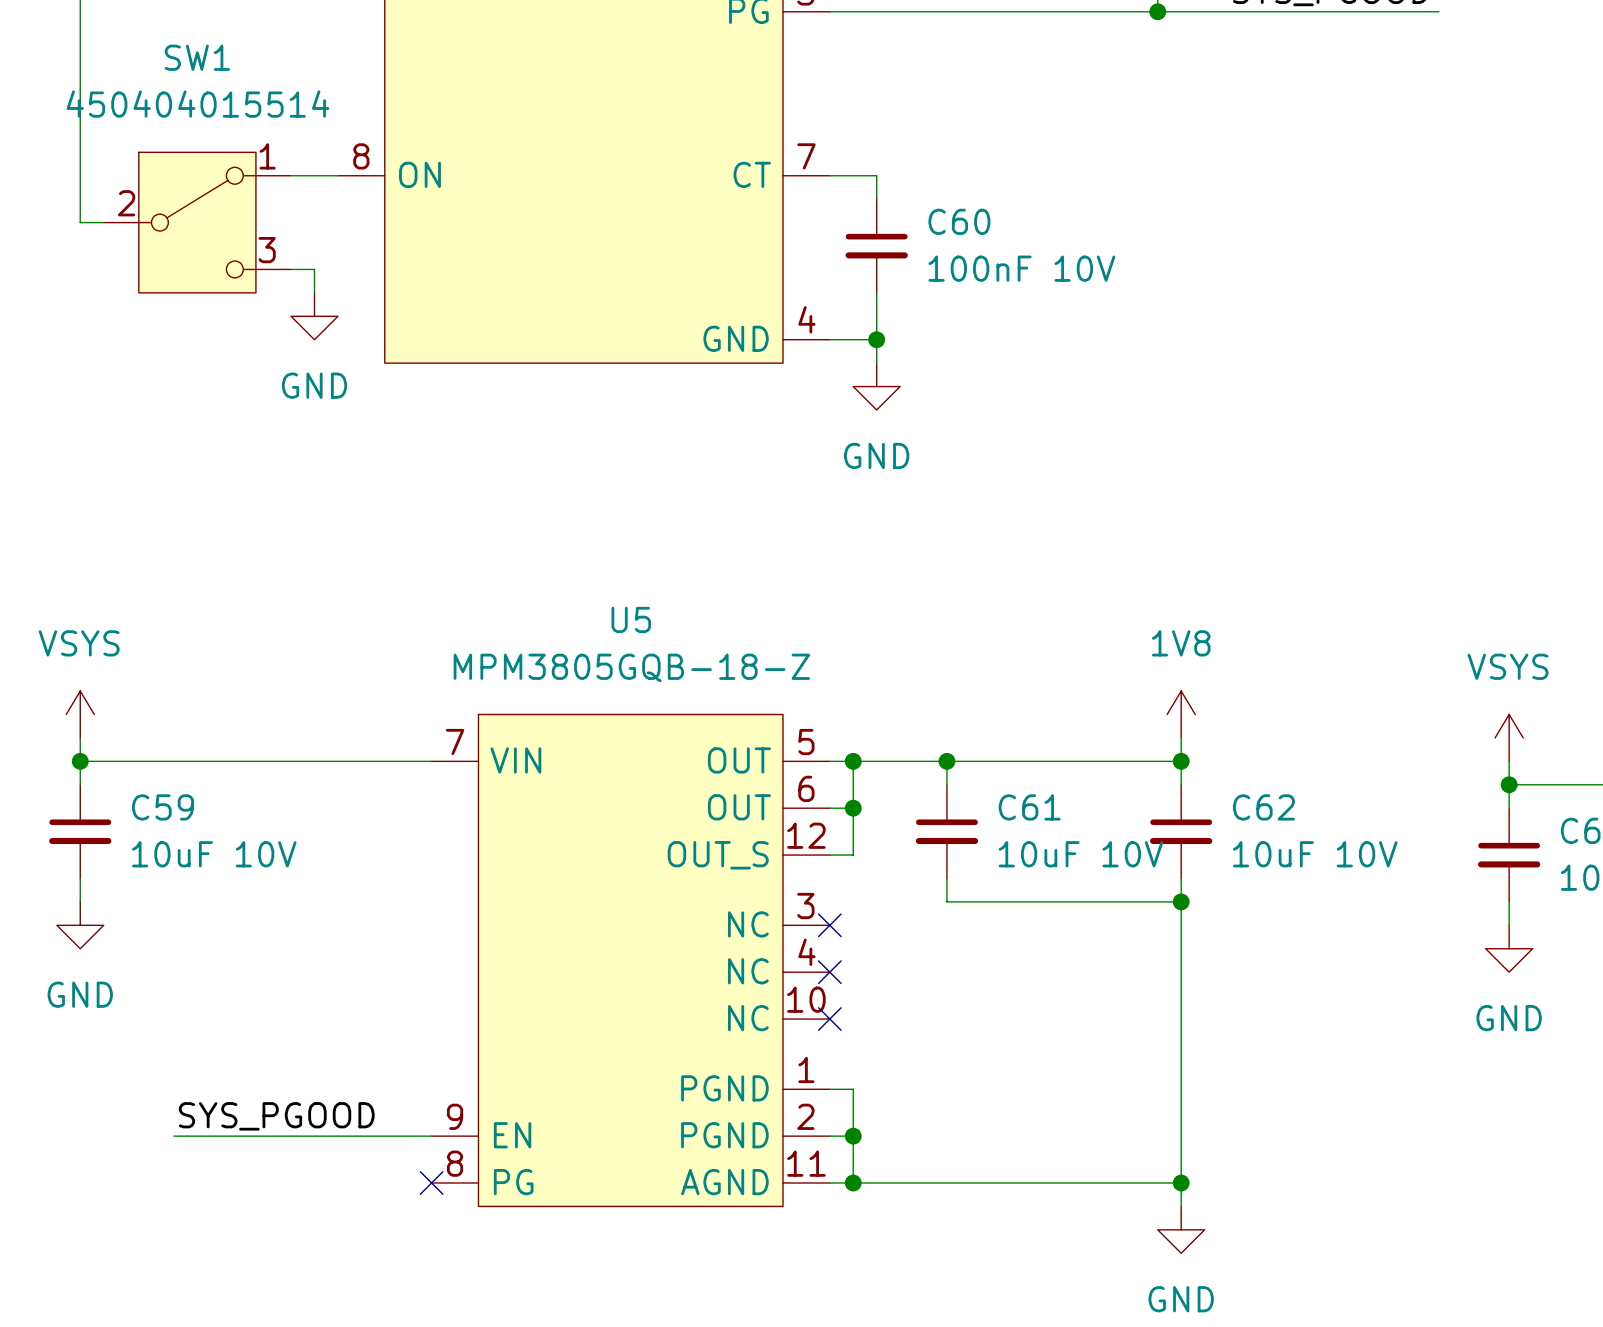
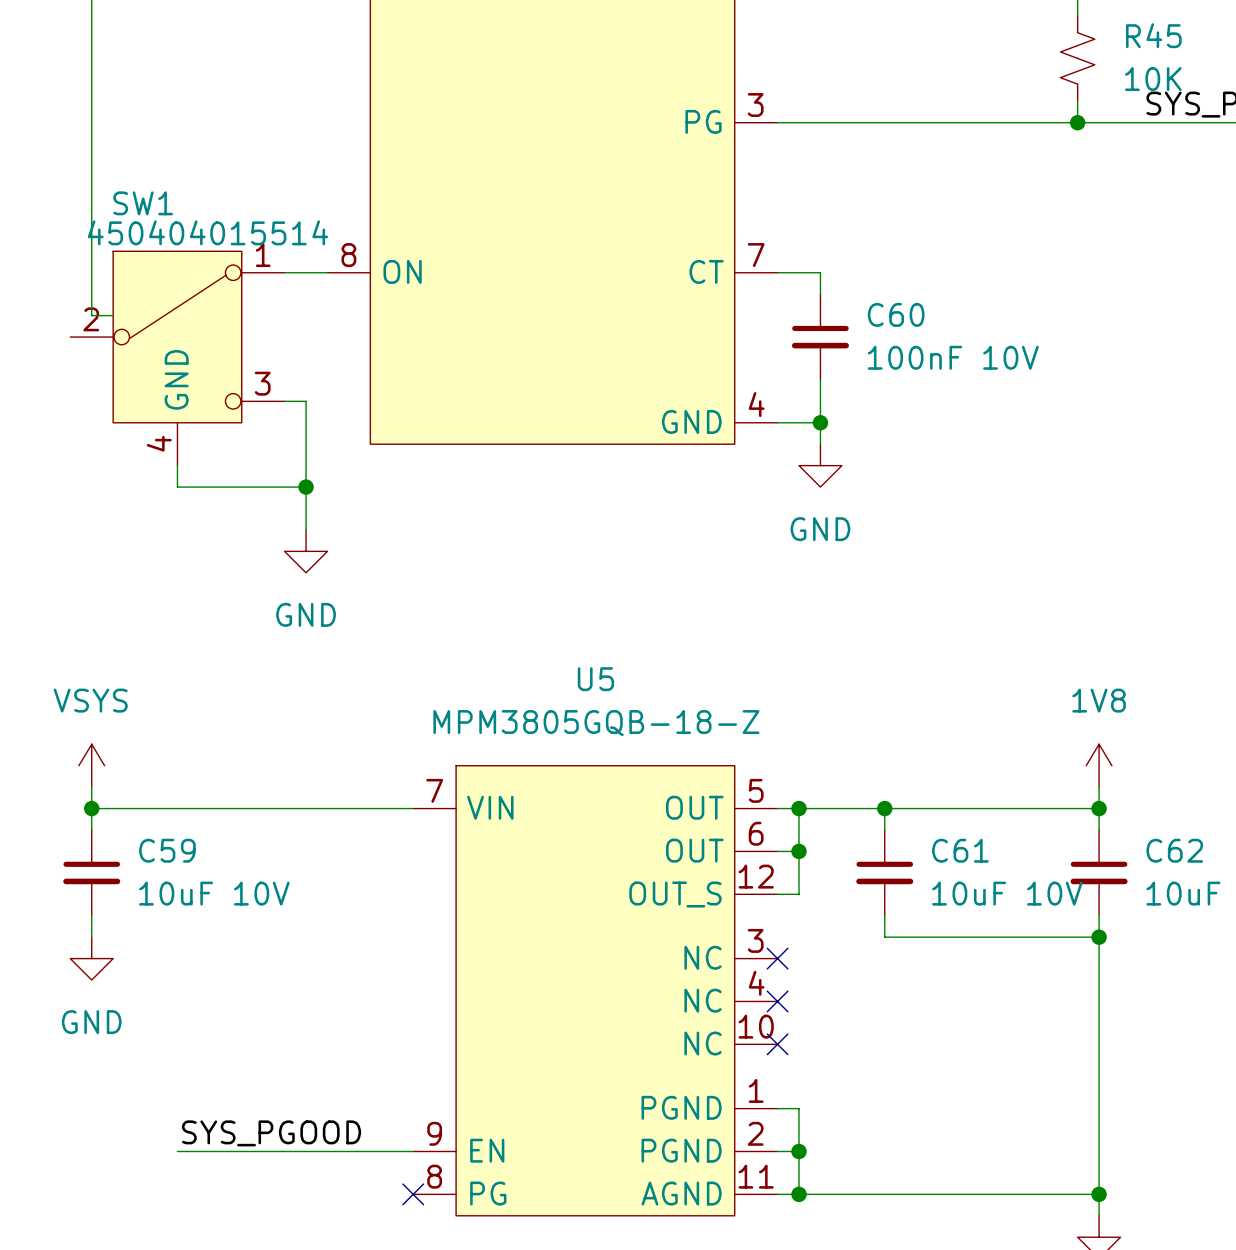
SW1 name position: SW1 (197, 57) -> SW1 (143, 203)
SW1 value position: 450404015514 (197, 104) -> 450404015514 (207, 232)
SW1 symbol: [103, 152, 292, 293] -> [70, 251, 285, 466]
wire: (291, 269) (314, 269) (314, 292) -> none
wire: none -> (284, 401) (306, 401) (306, 529)
power symbol position: GND (314, 316) -> GND (306, 551)
wire: none -> (177, 465) (177, 487) (306, 487)
junction: none -> (306, 487)

